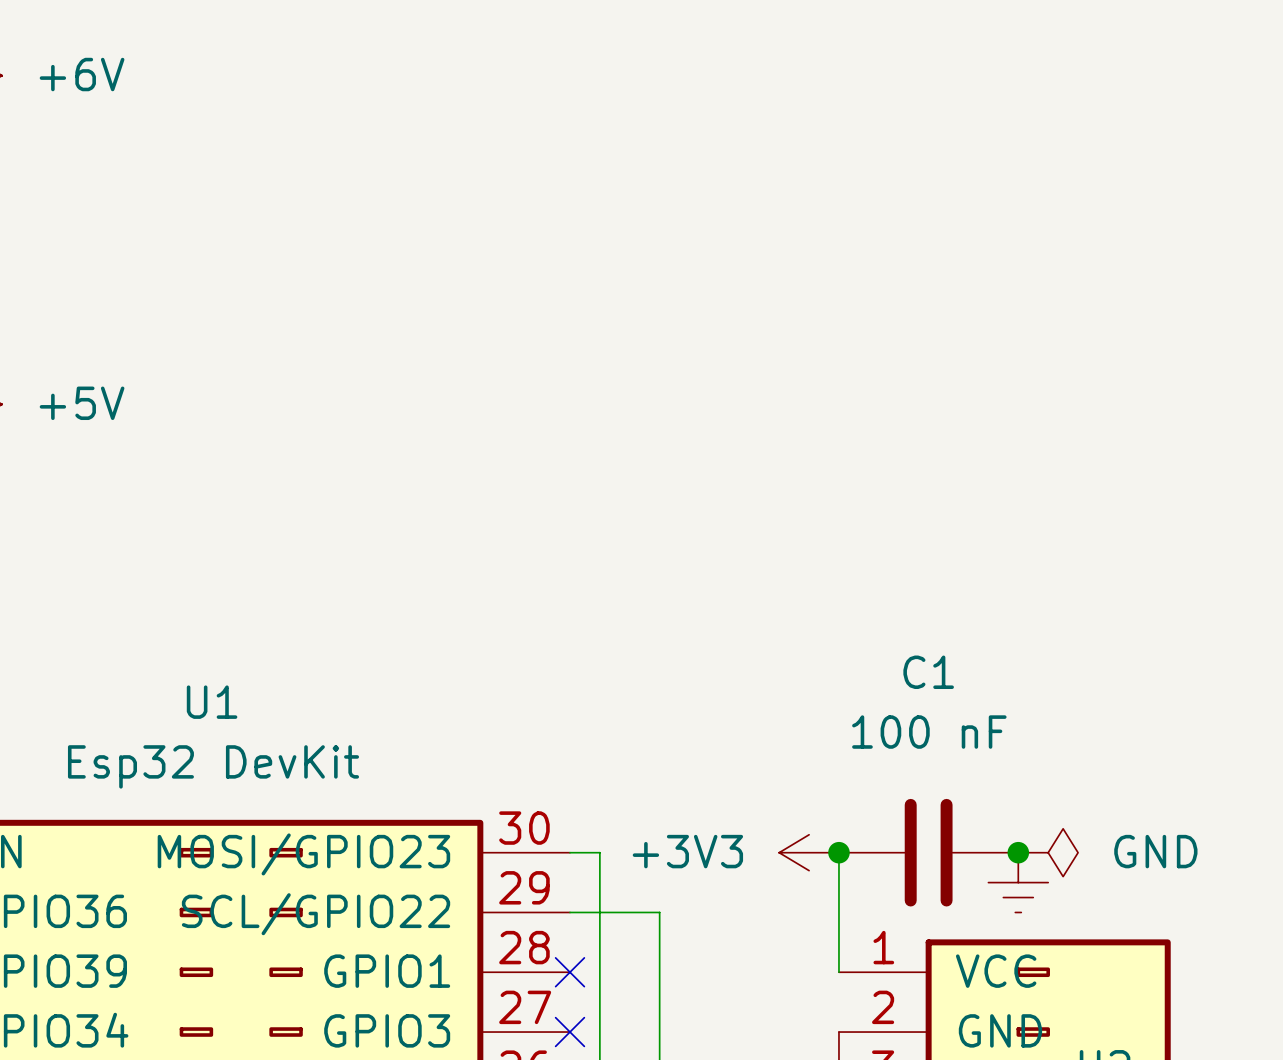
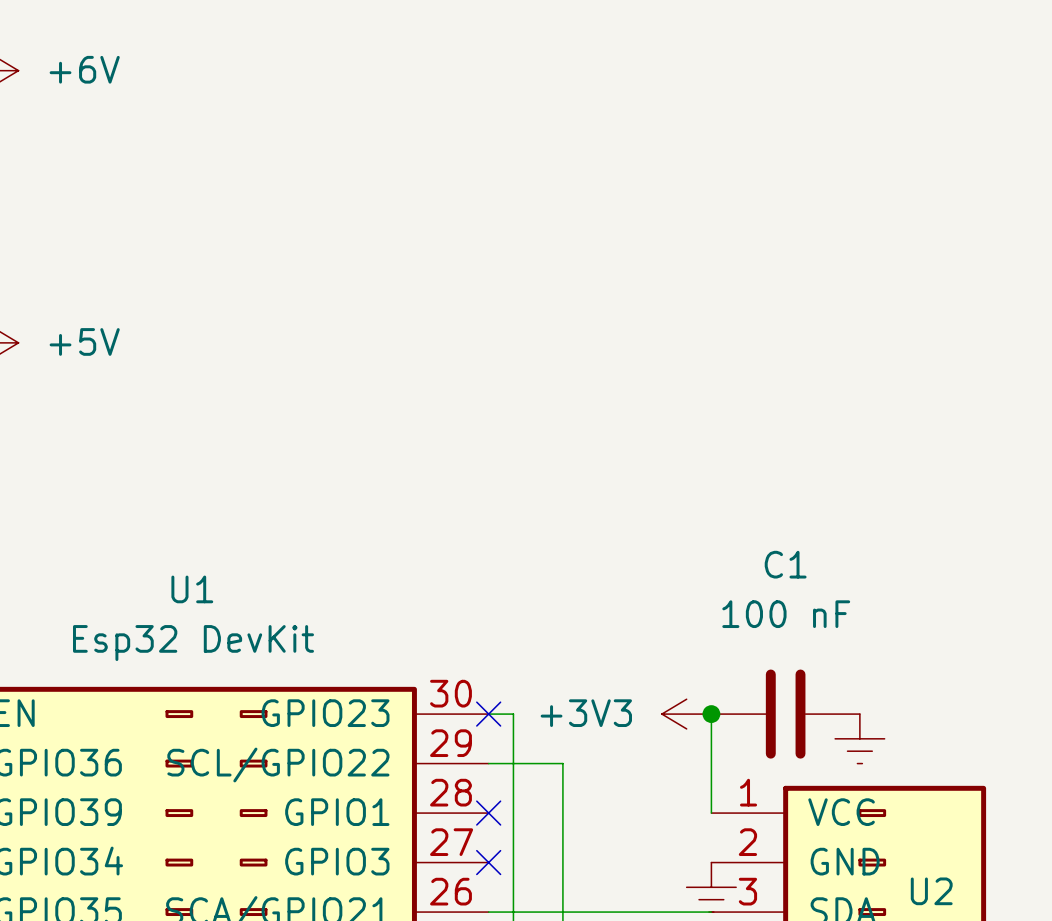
no-connect mark: none -> (488, 714)
junction: (1018, 852) -> none
power symbol: GND (1048, 852) -> none
U1 pin name: ΜΟSI/GPIO23 (303, 854) -> GPIO23 (325, 713)

